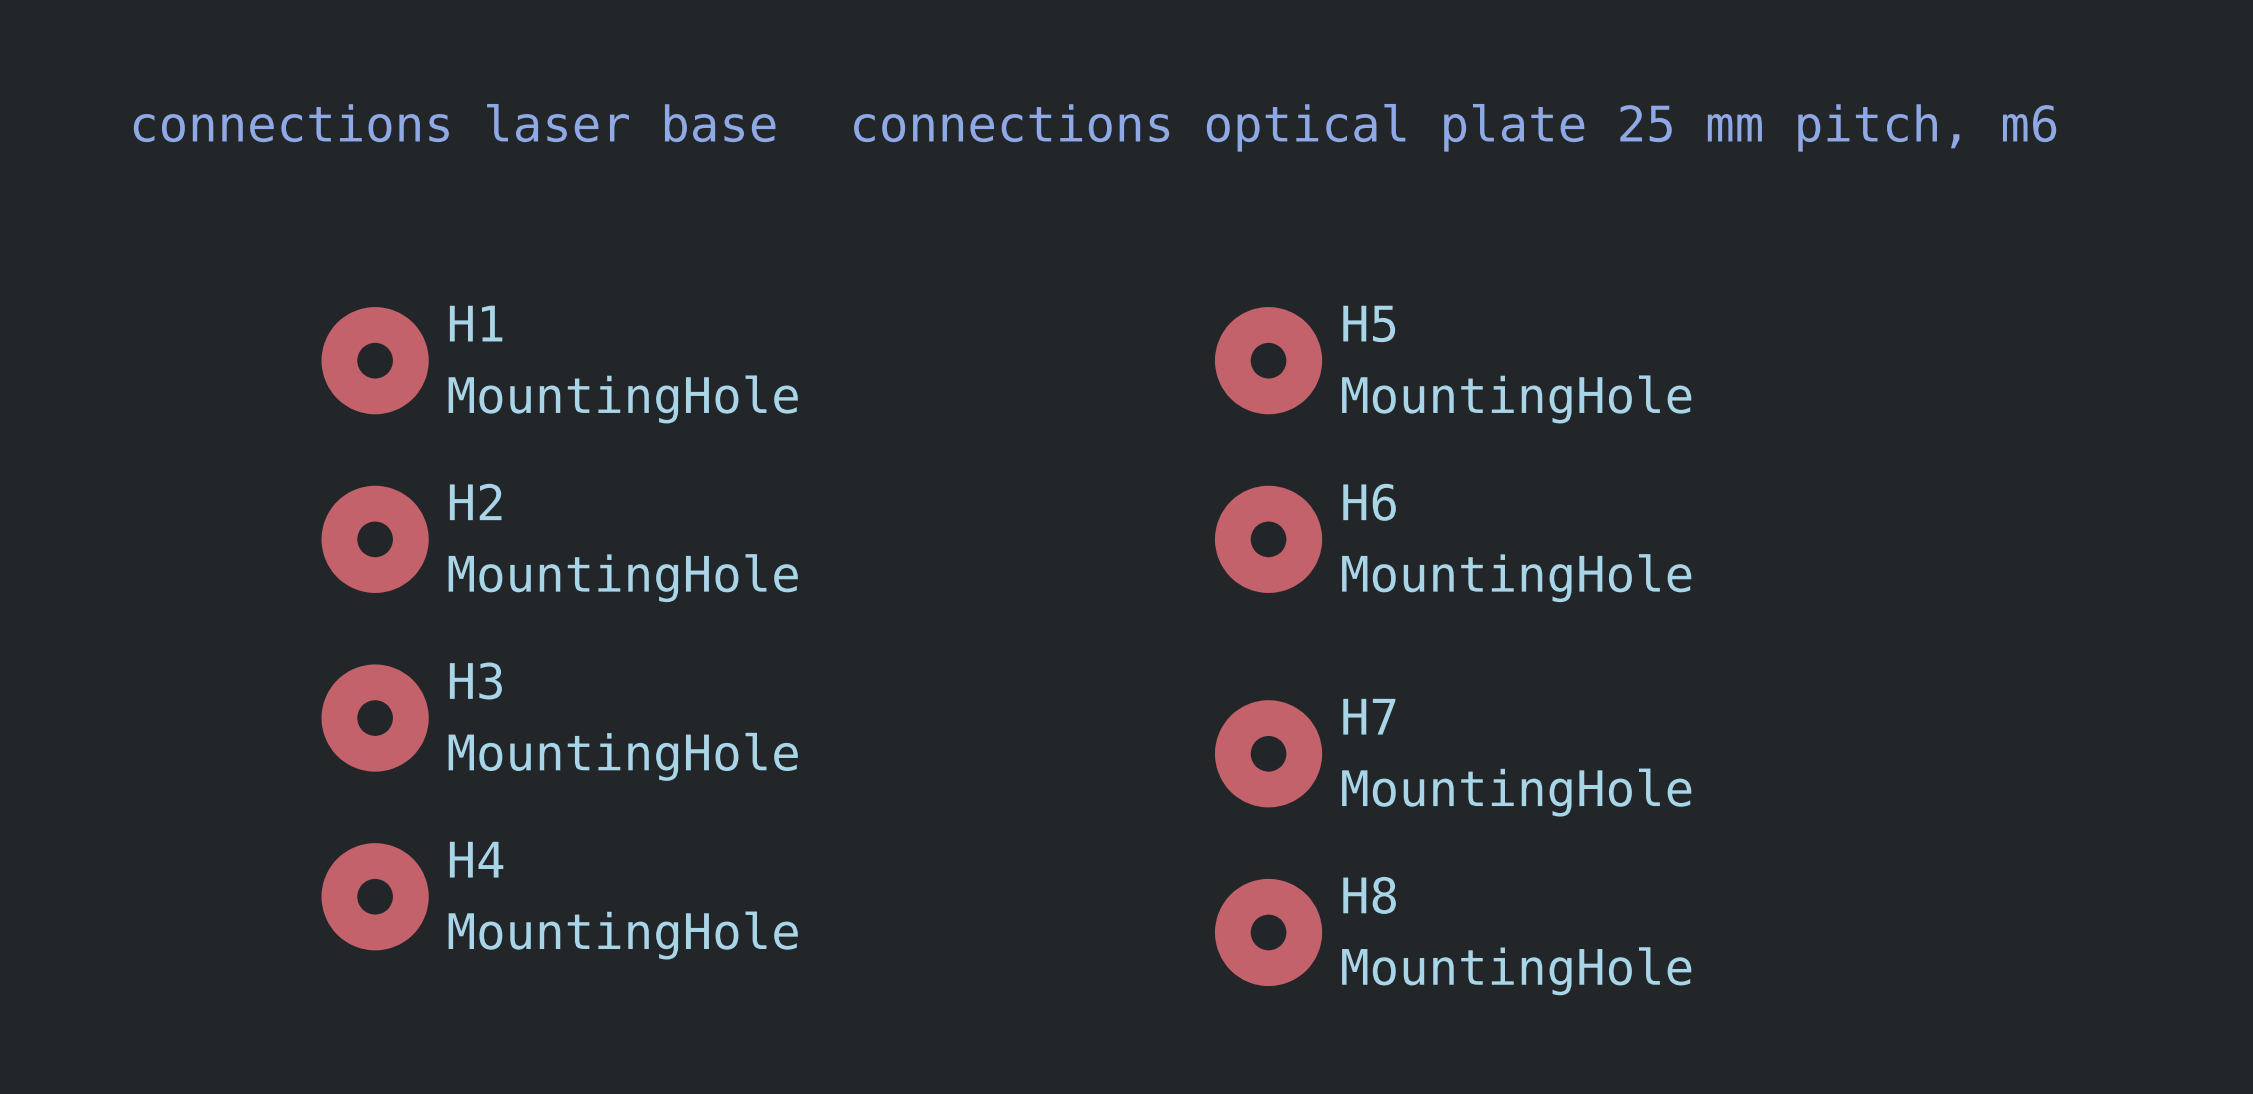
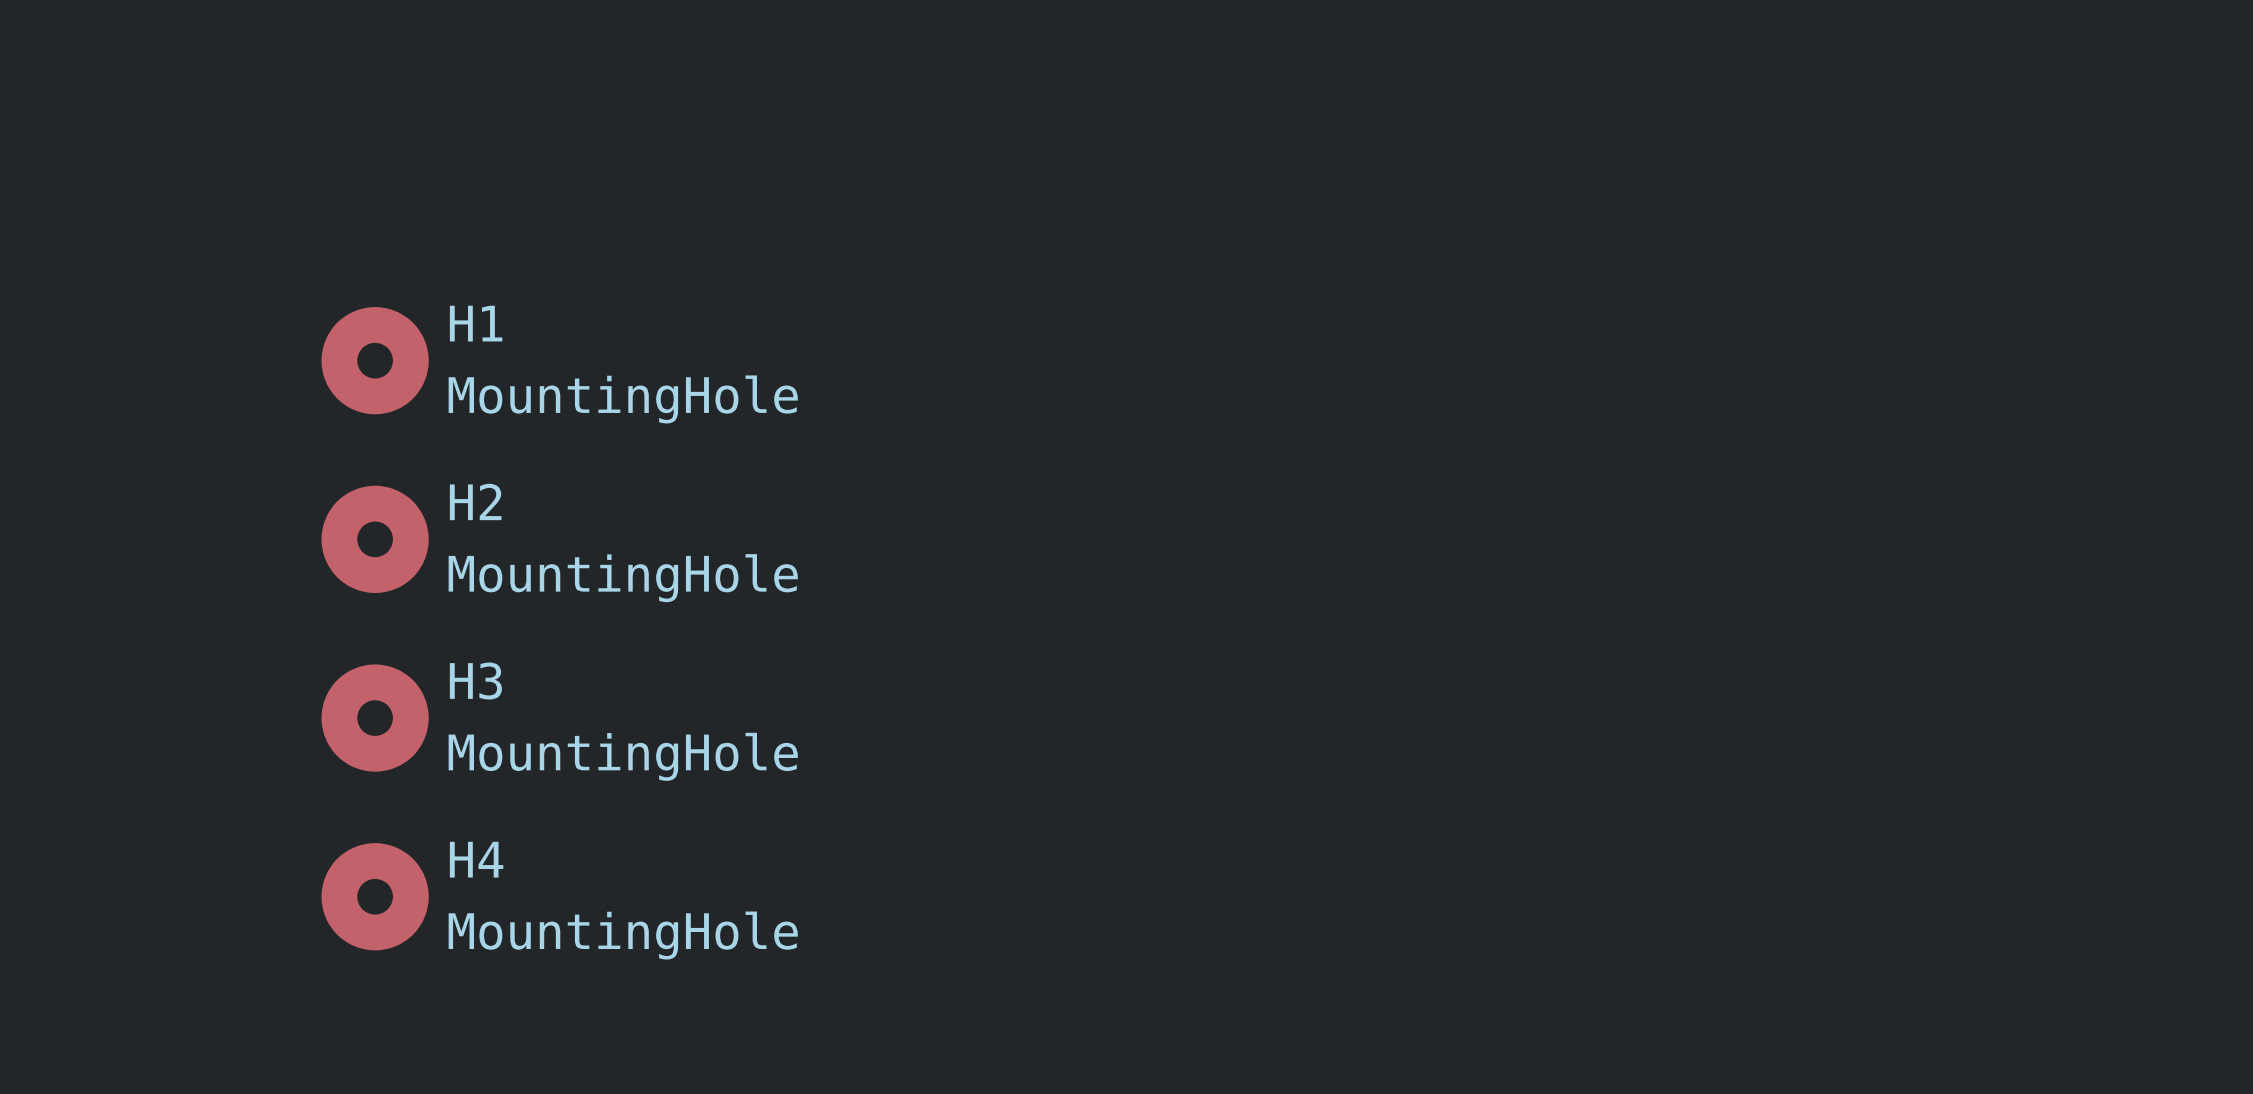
text: connections laser base (454, 123) -> none
text: connections optical plate 25 mm pitch, m6 (1455, 127) -> none
H5: MountingHole (1268, 360) -> none
H6: MountingHole (1268, 539) -> none
H7: MountingHole (1268, 753) -> none
H8: MountingHole (1268, 932) -> none

